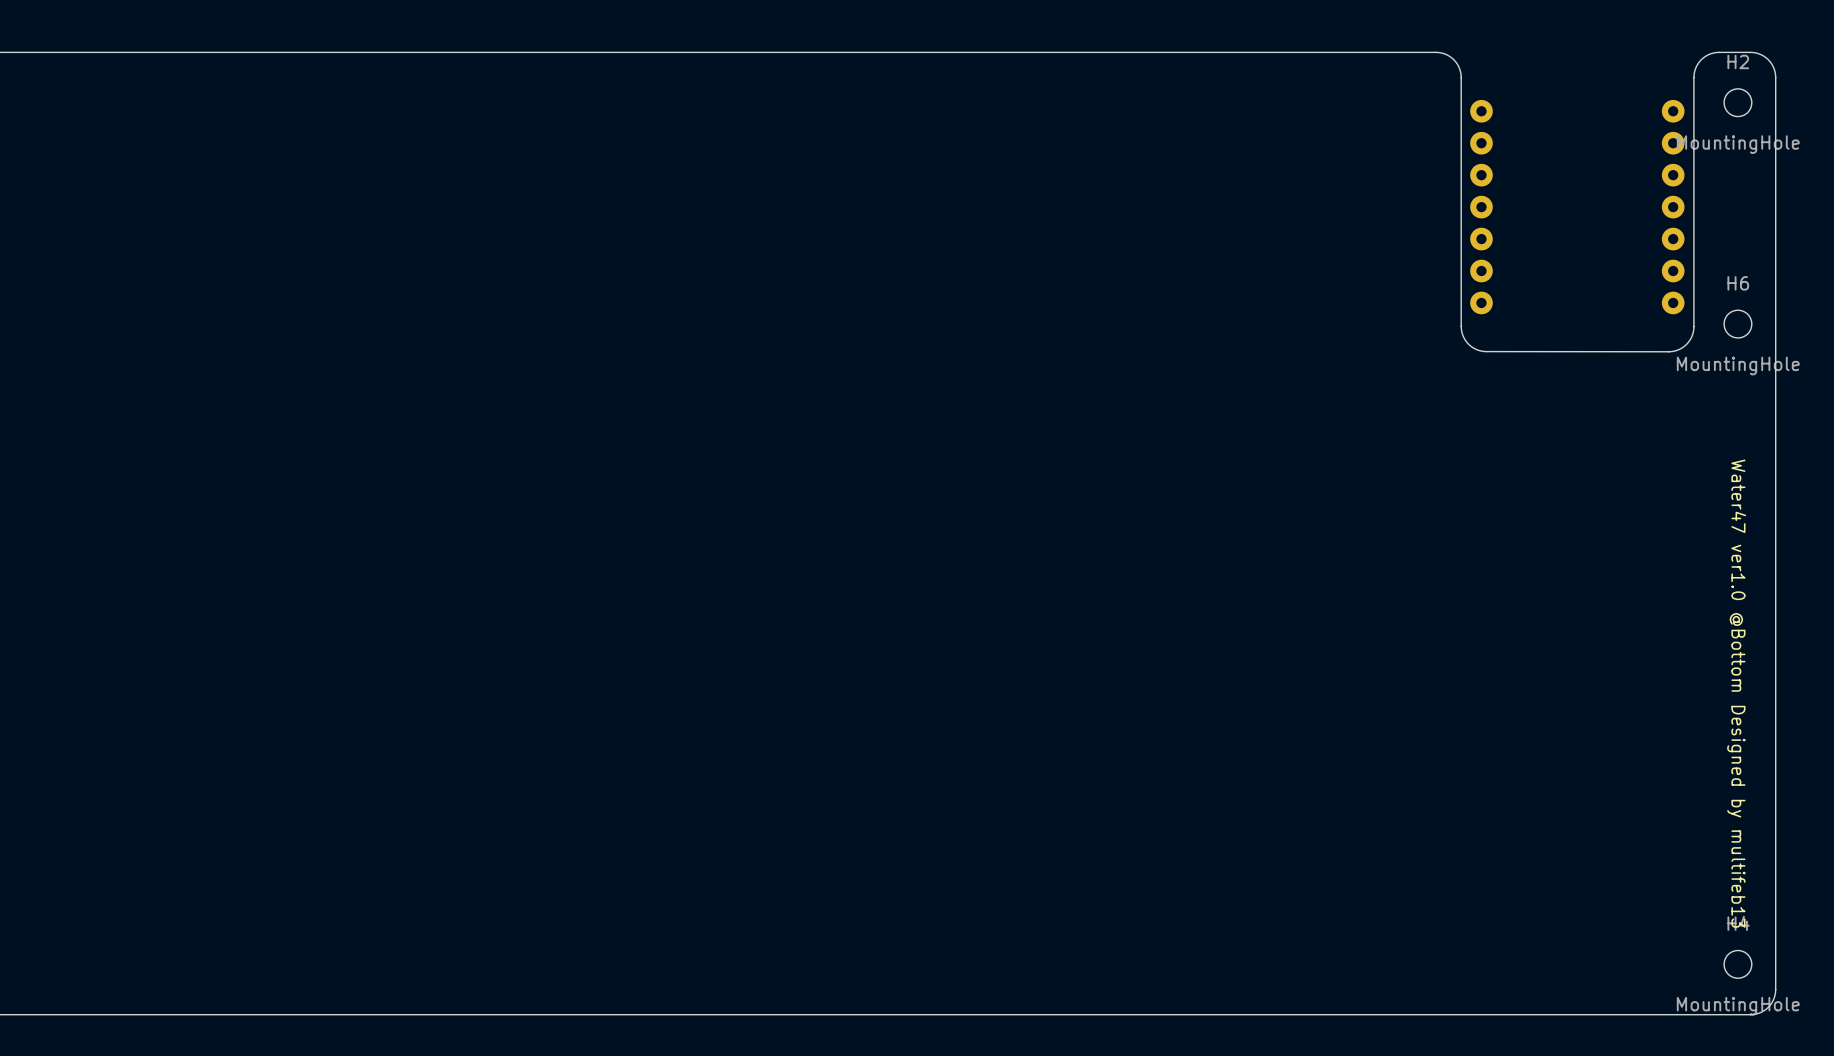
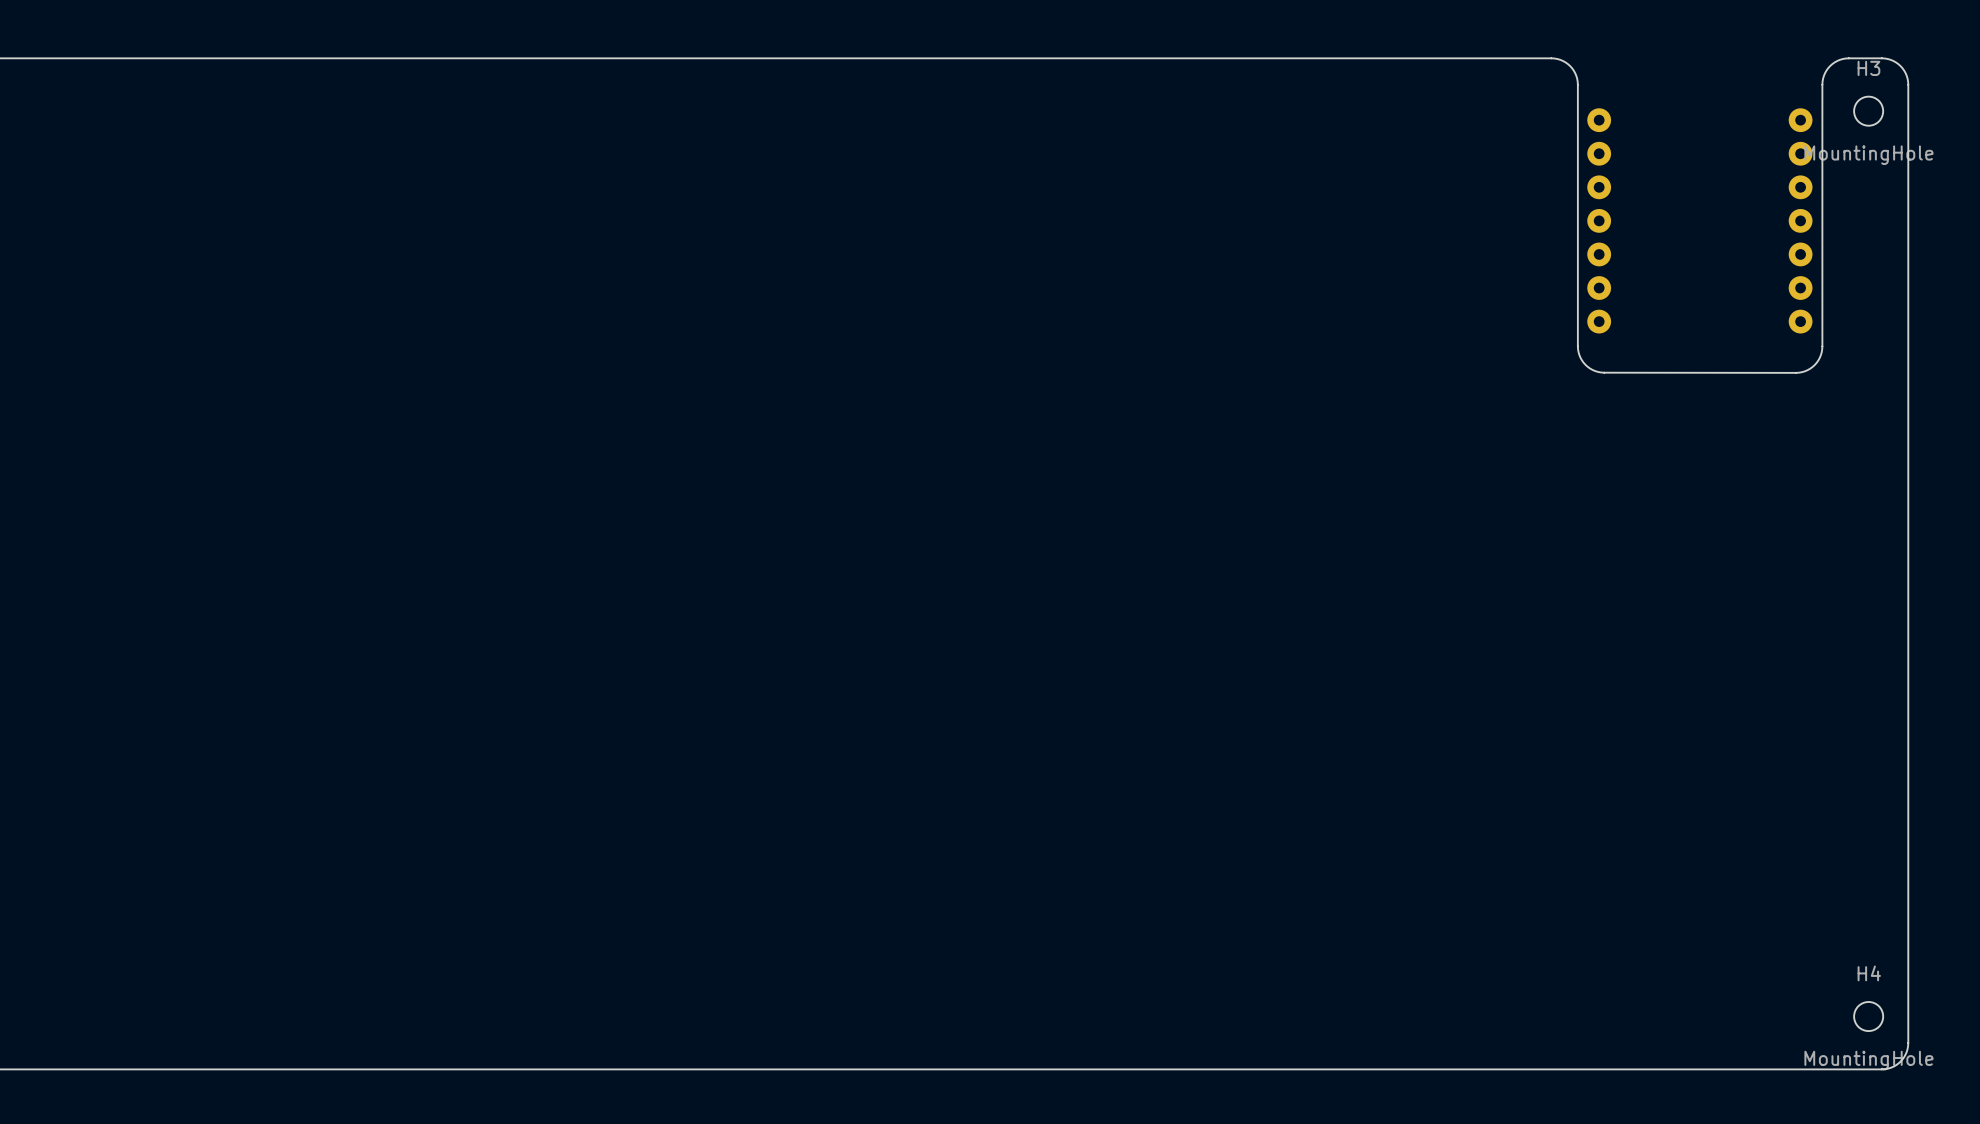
H2 name: H2 (1738, 61) -> H3 (1868, 68)
H6: MountingHole (1737, 324) -> none
text: Water47 ver1.0 @Bottom Designed by multifeb13 (1736, 693) -> none

